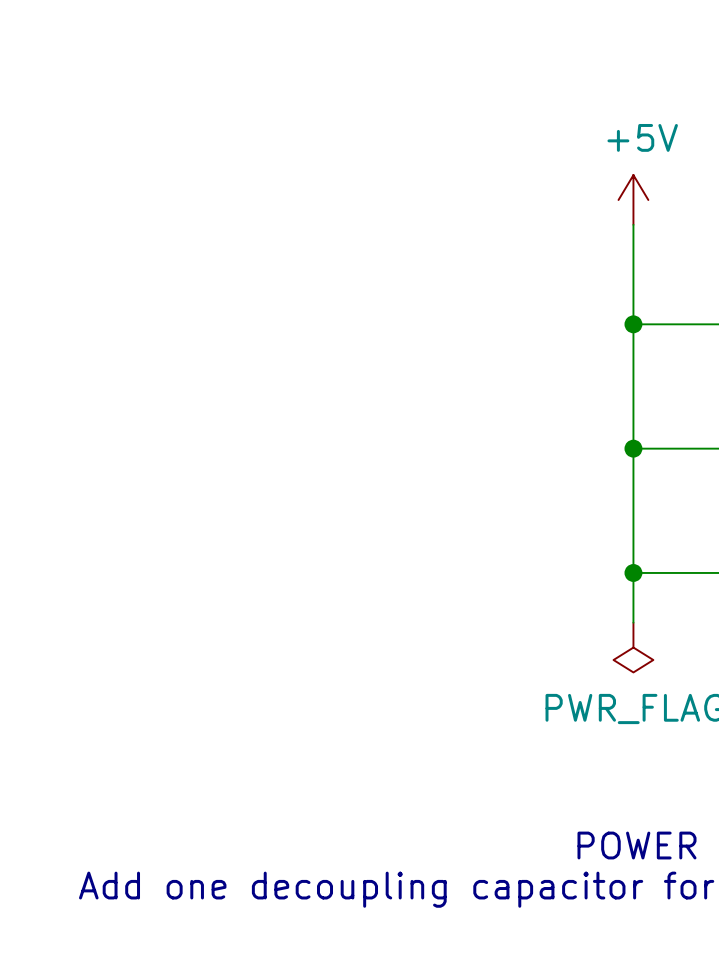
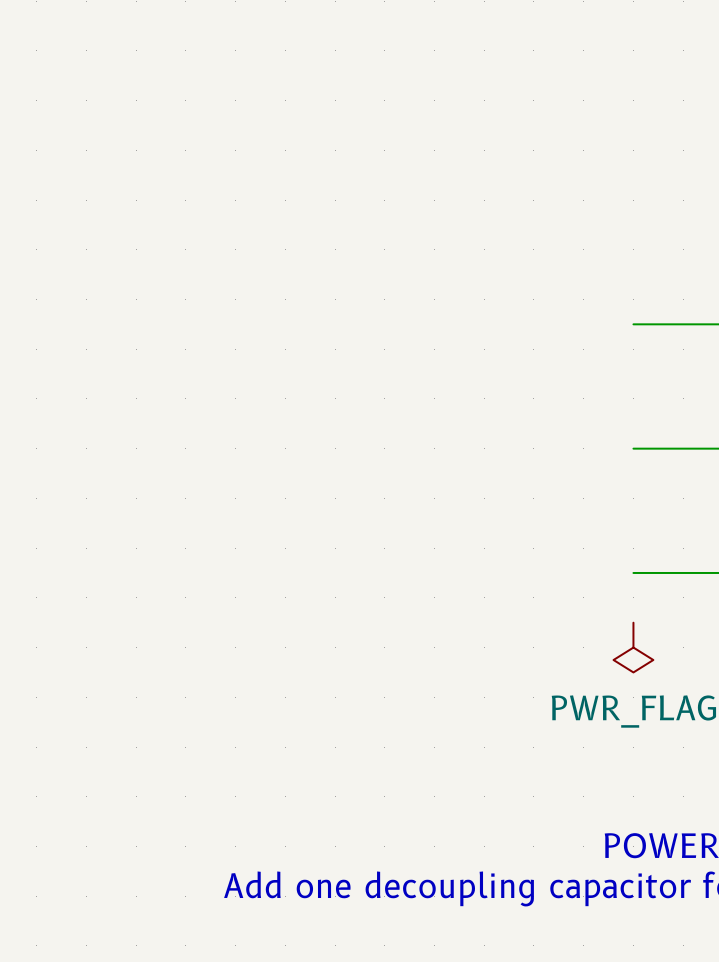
power symbol: +5V (633, 200) -> none
wire: (633, 224) (633, 622) -> none
junction: (633, 324) -> none
junction: (633, 448) -> none
junction: (633, 572) -> none

